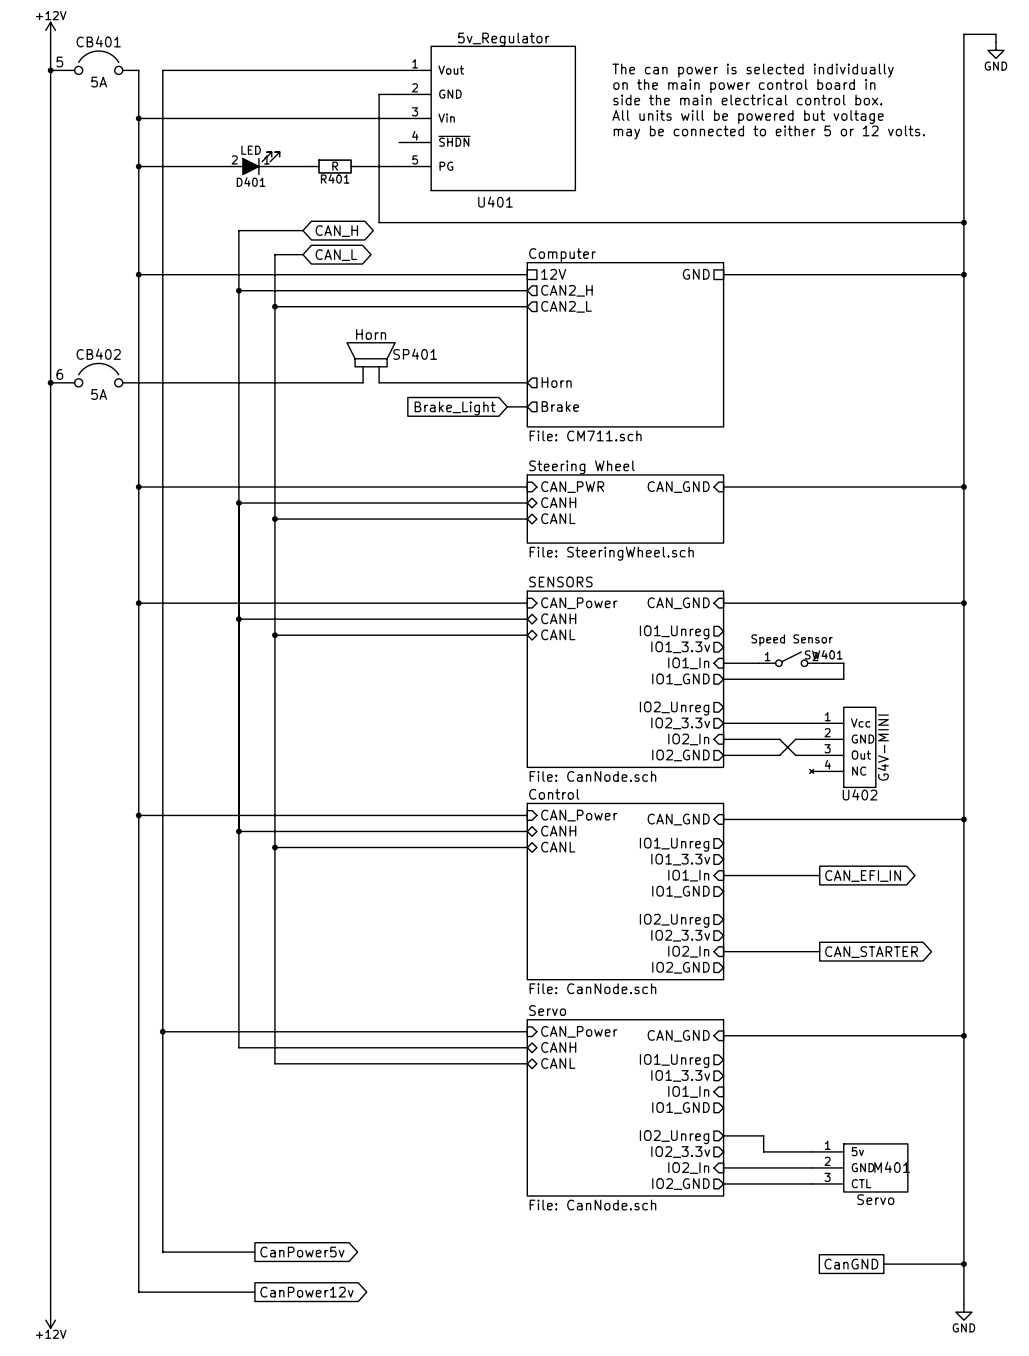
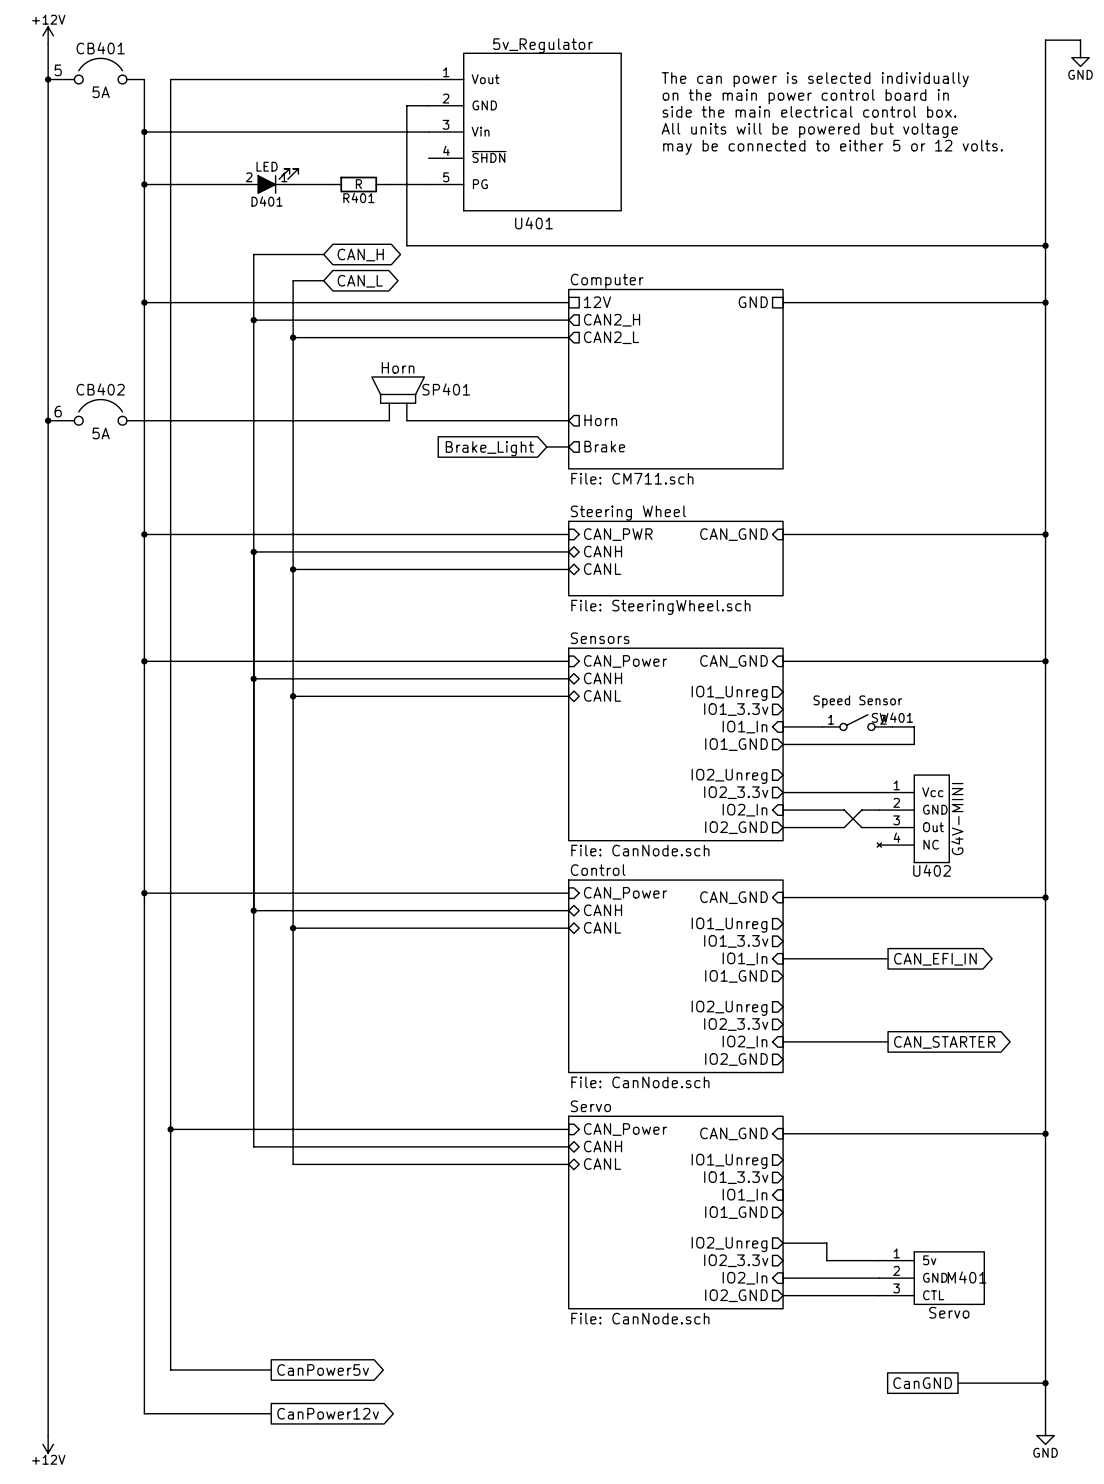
sheet SENSORS name: SENSORS (560, 582) -> Sensors (600, 638)

